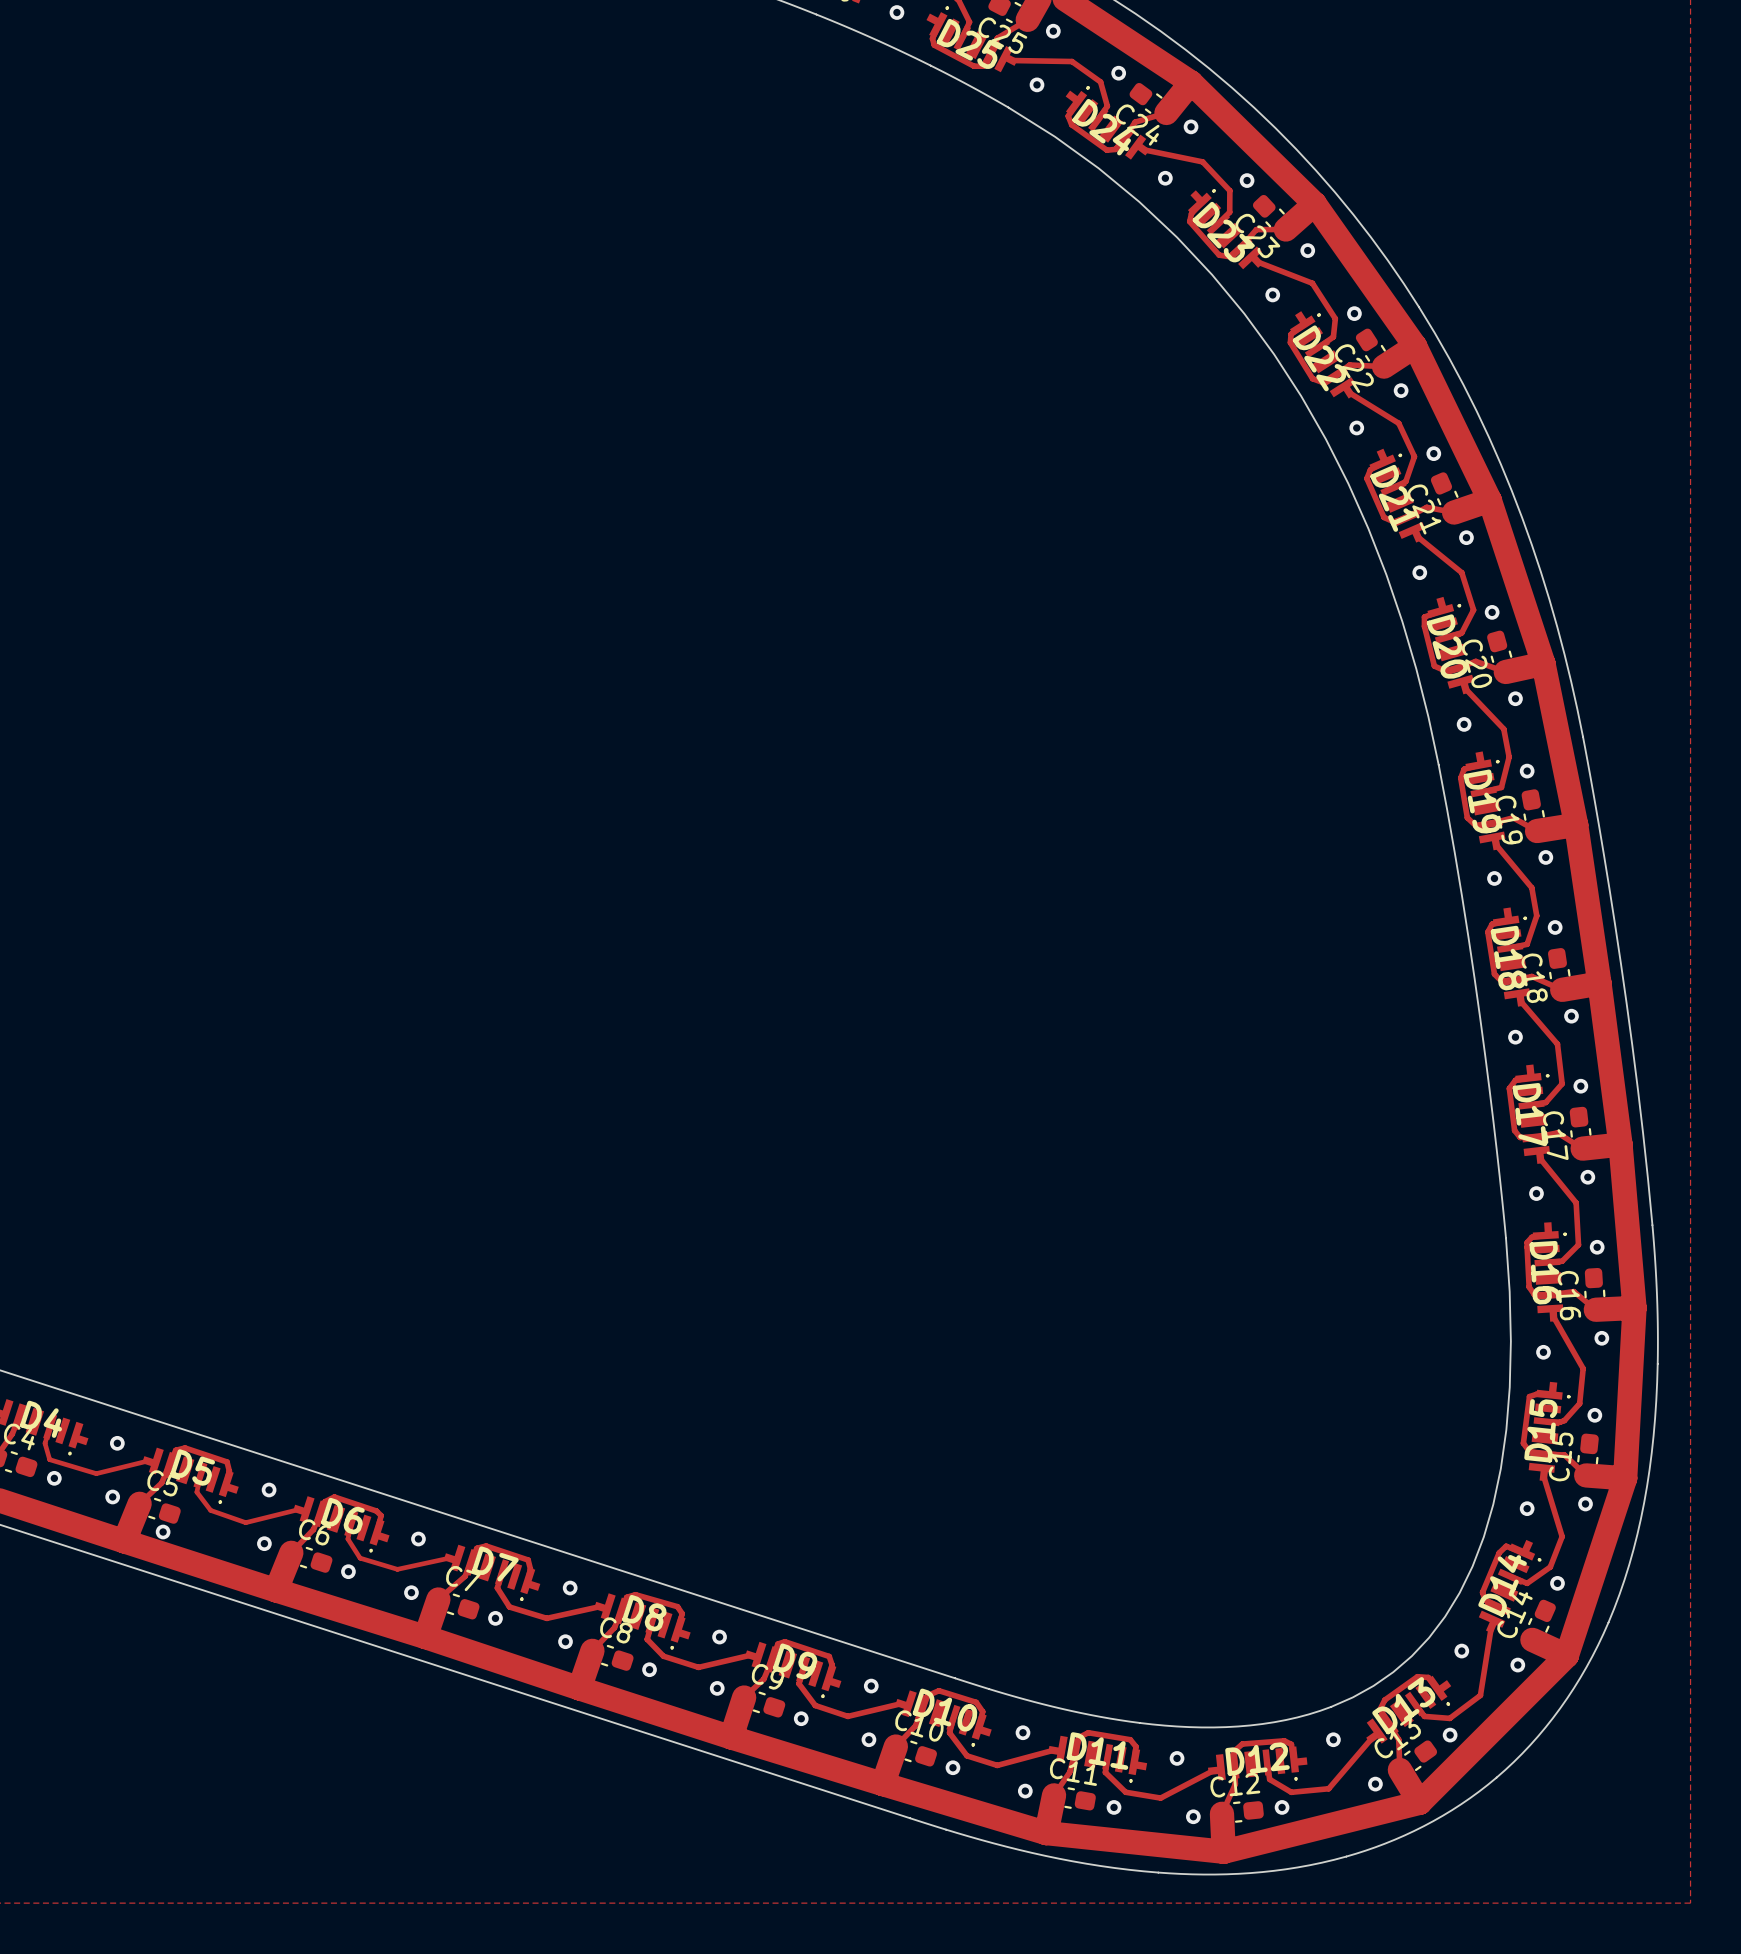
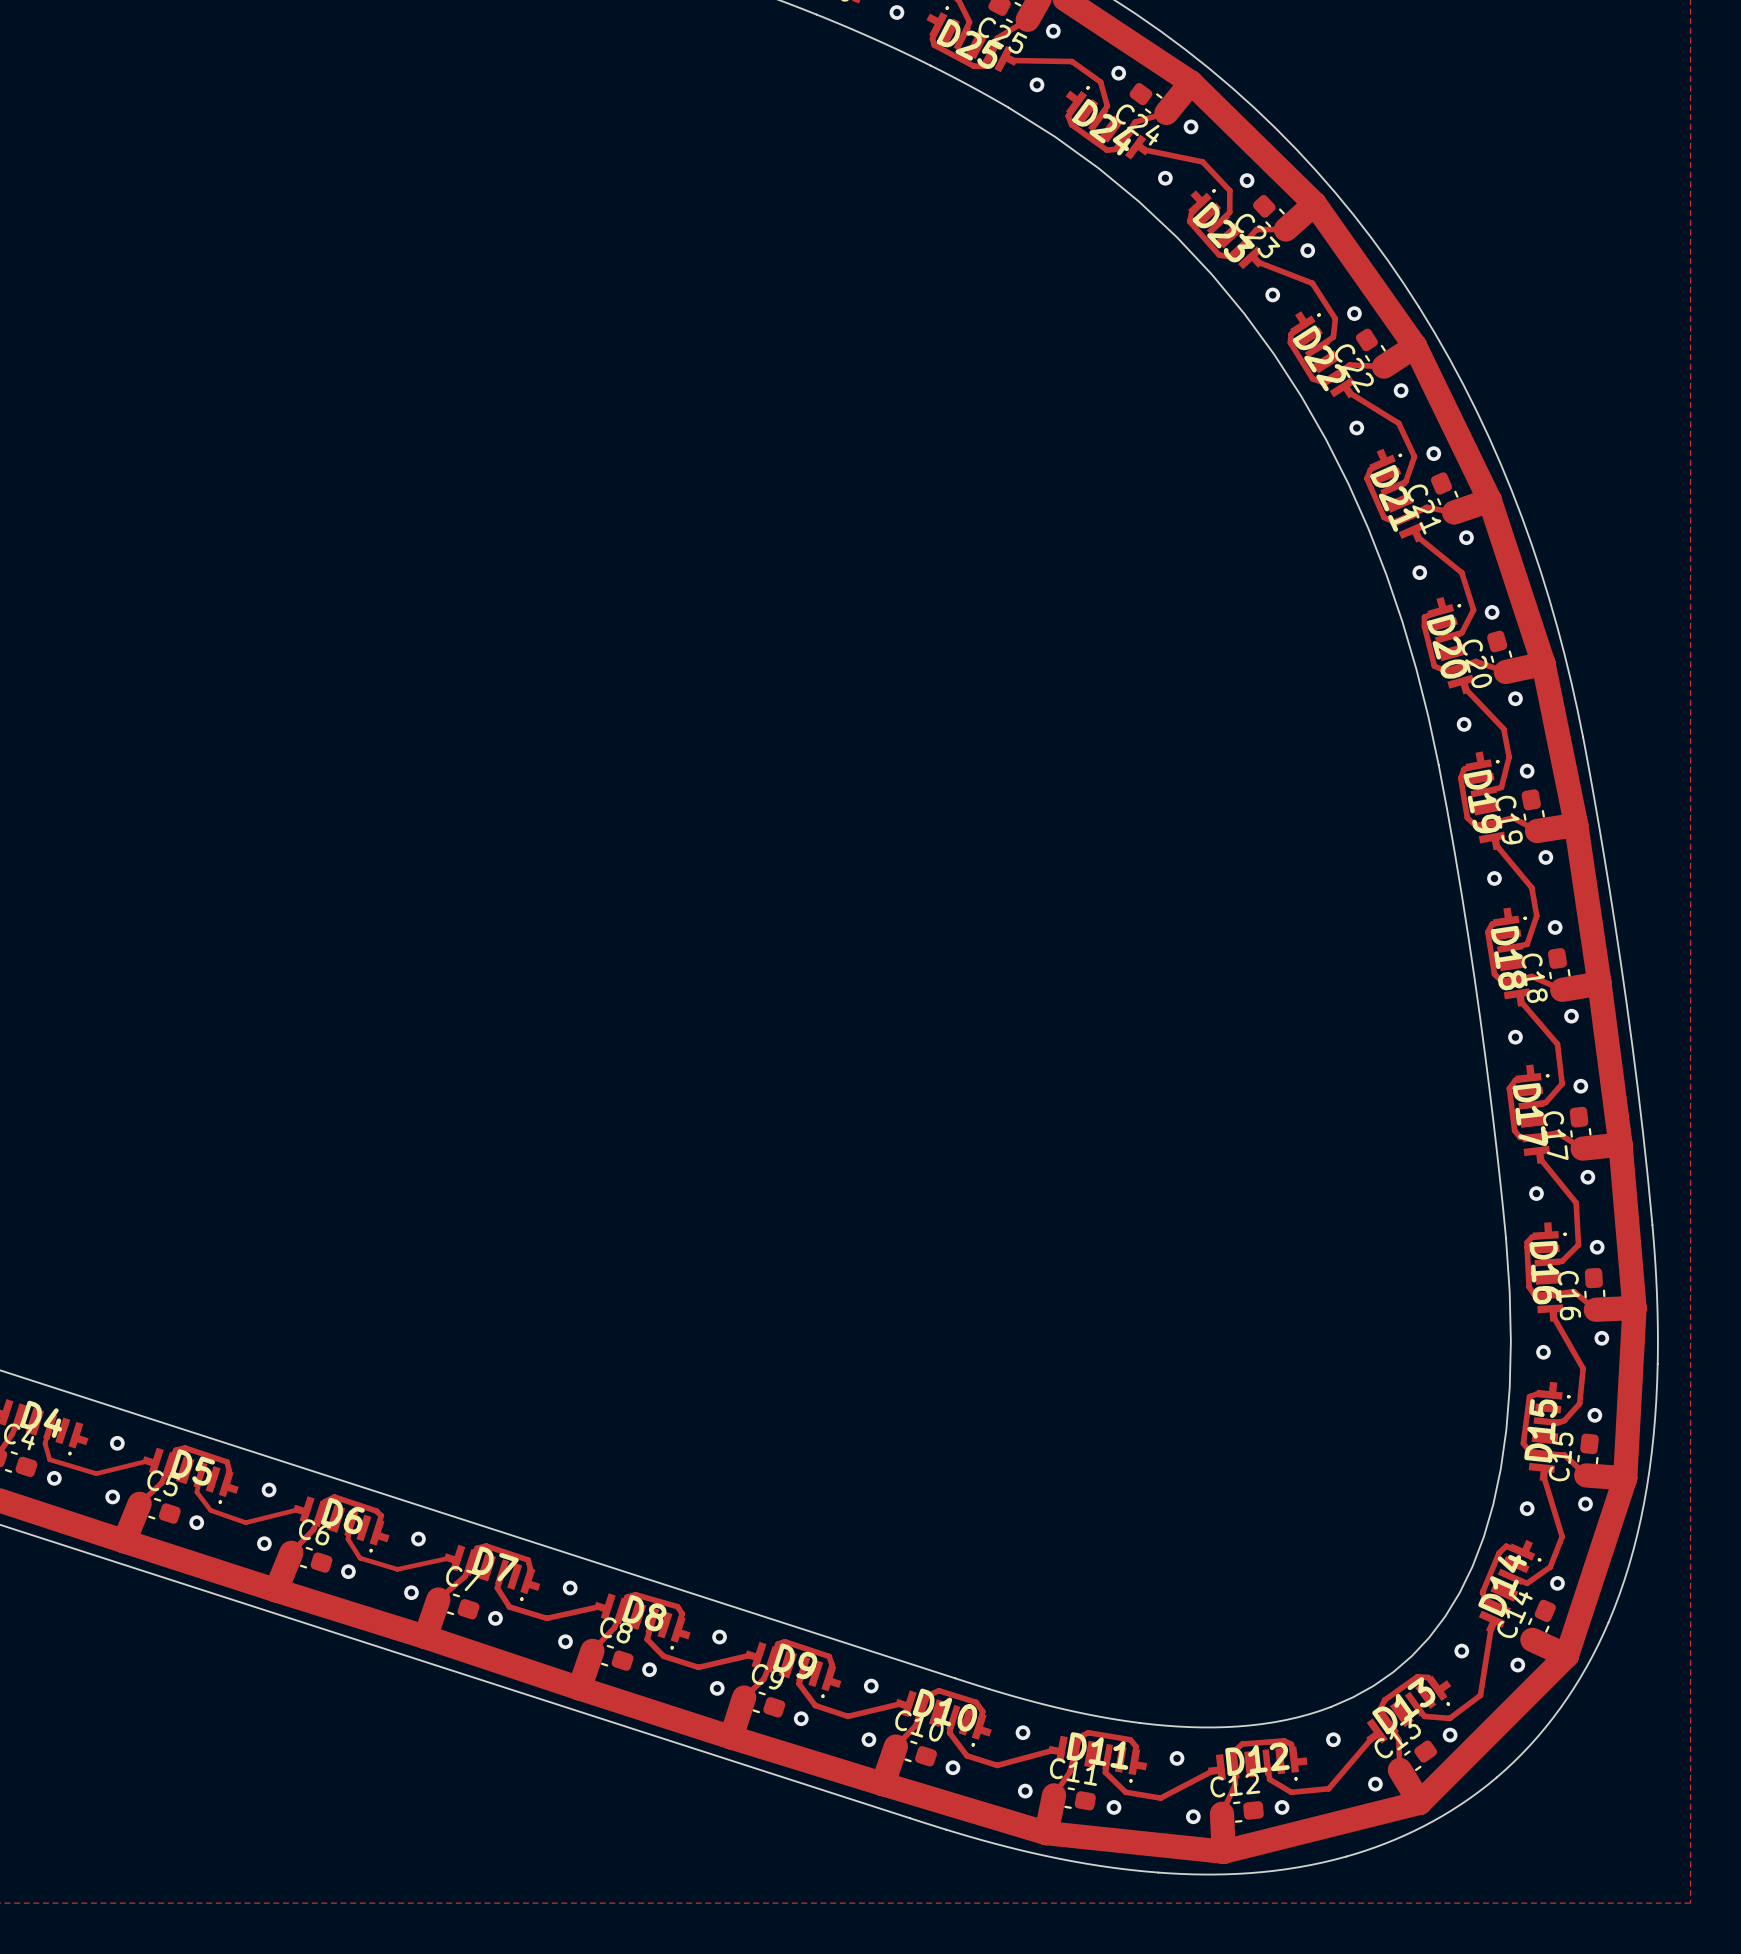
via position: (163, 1532) -> (196, 1522)

